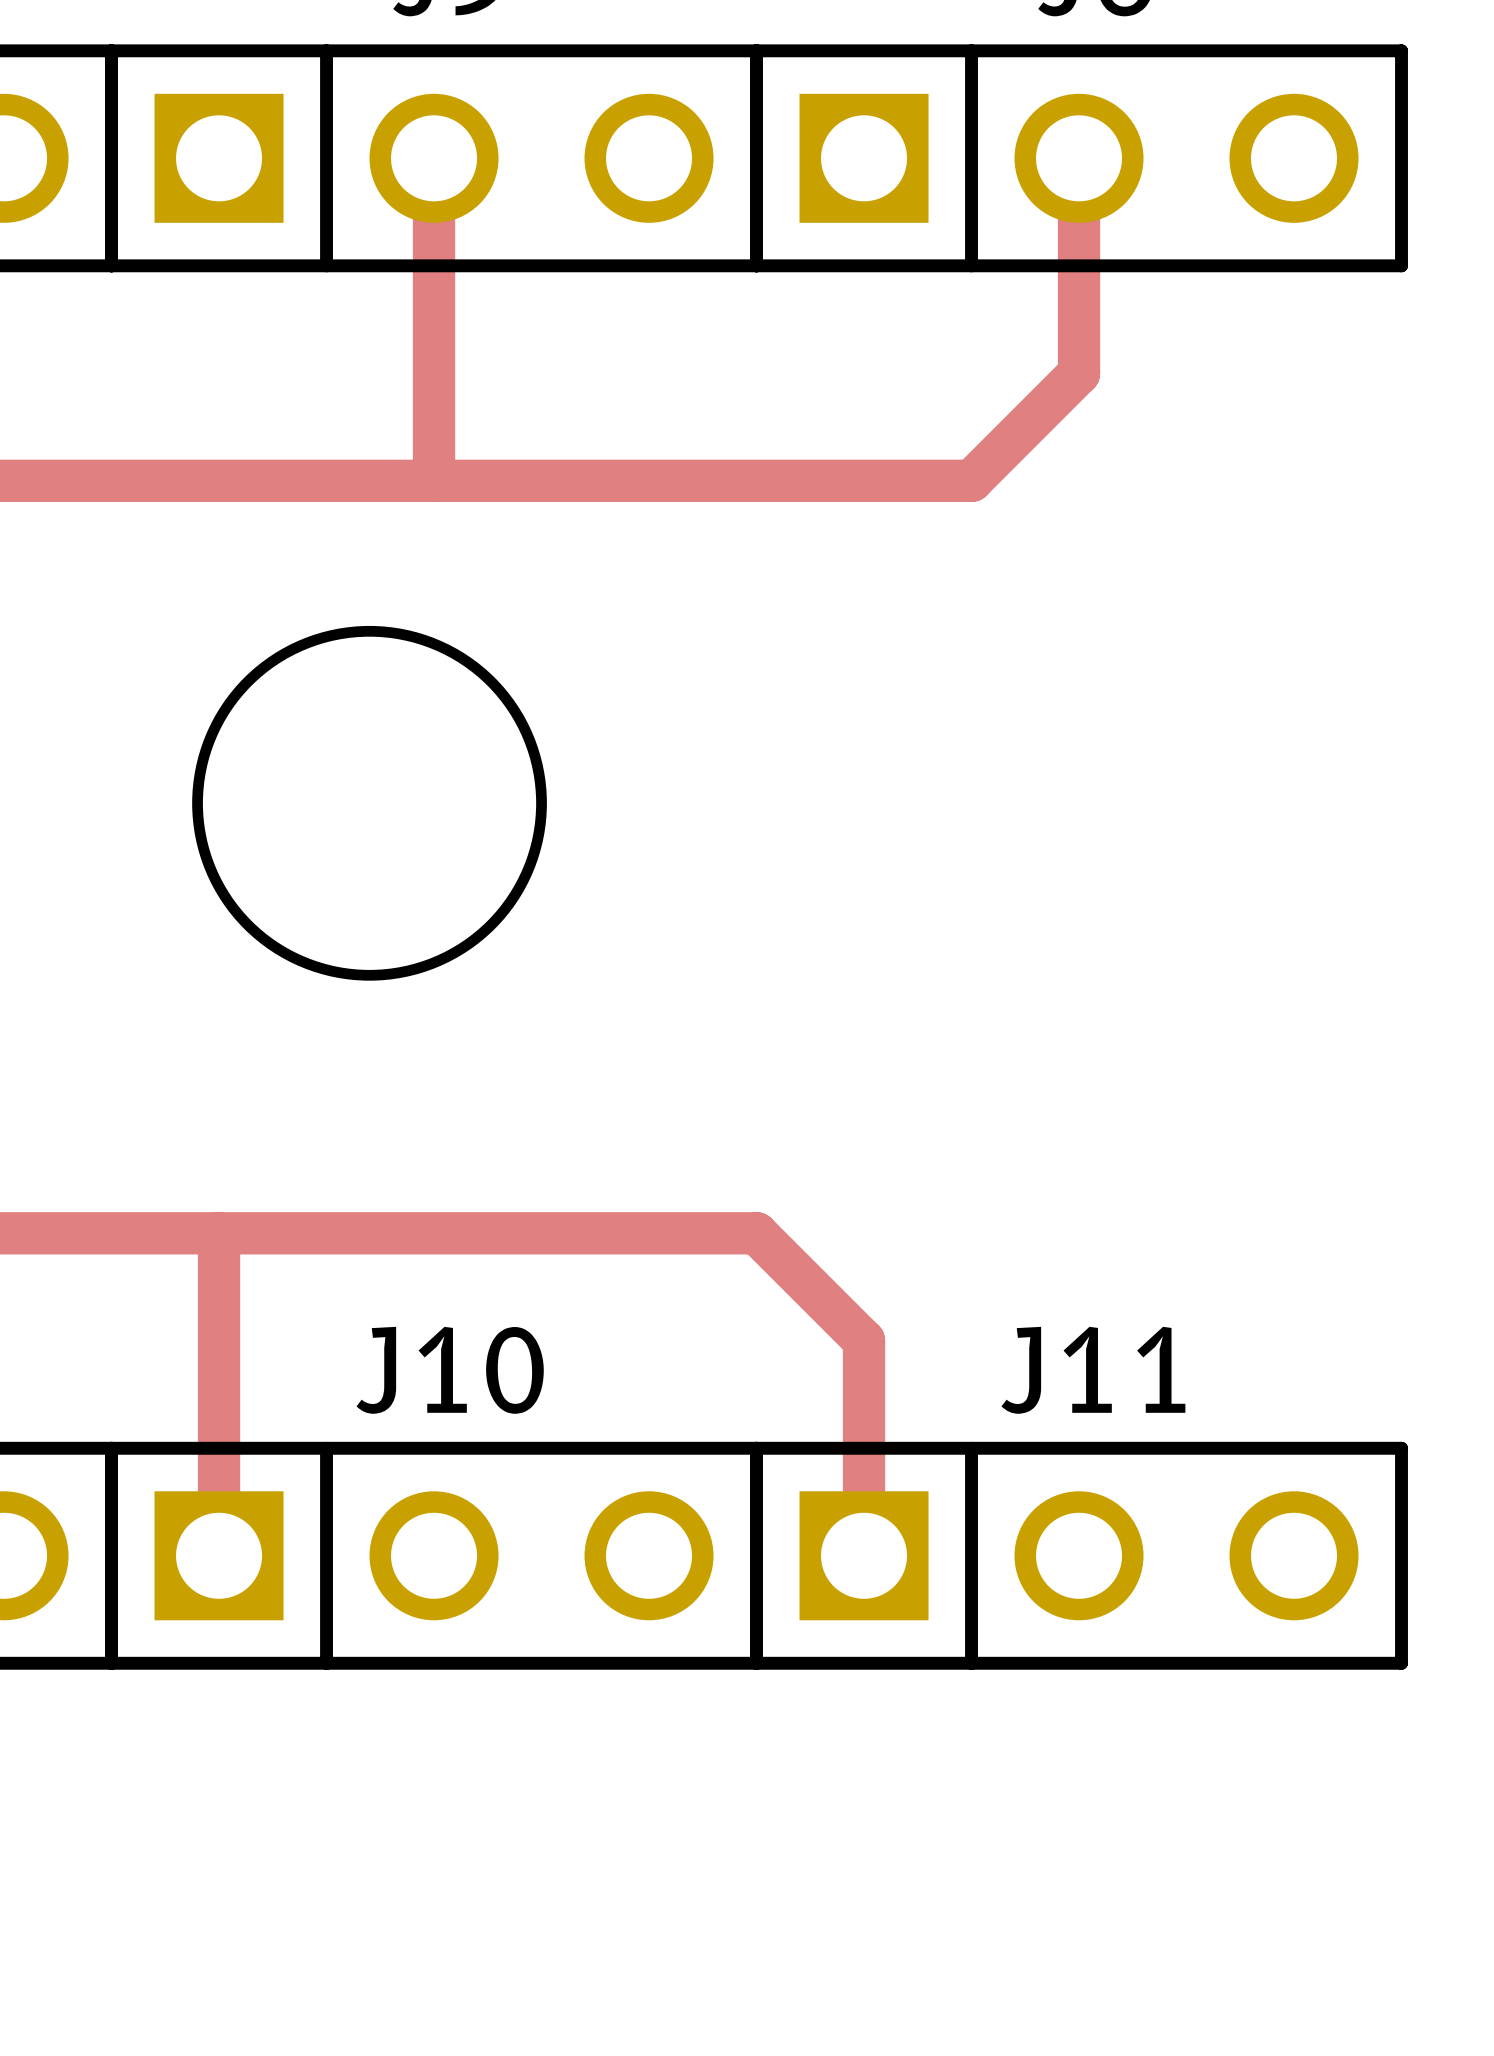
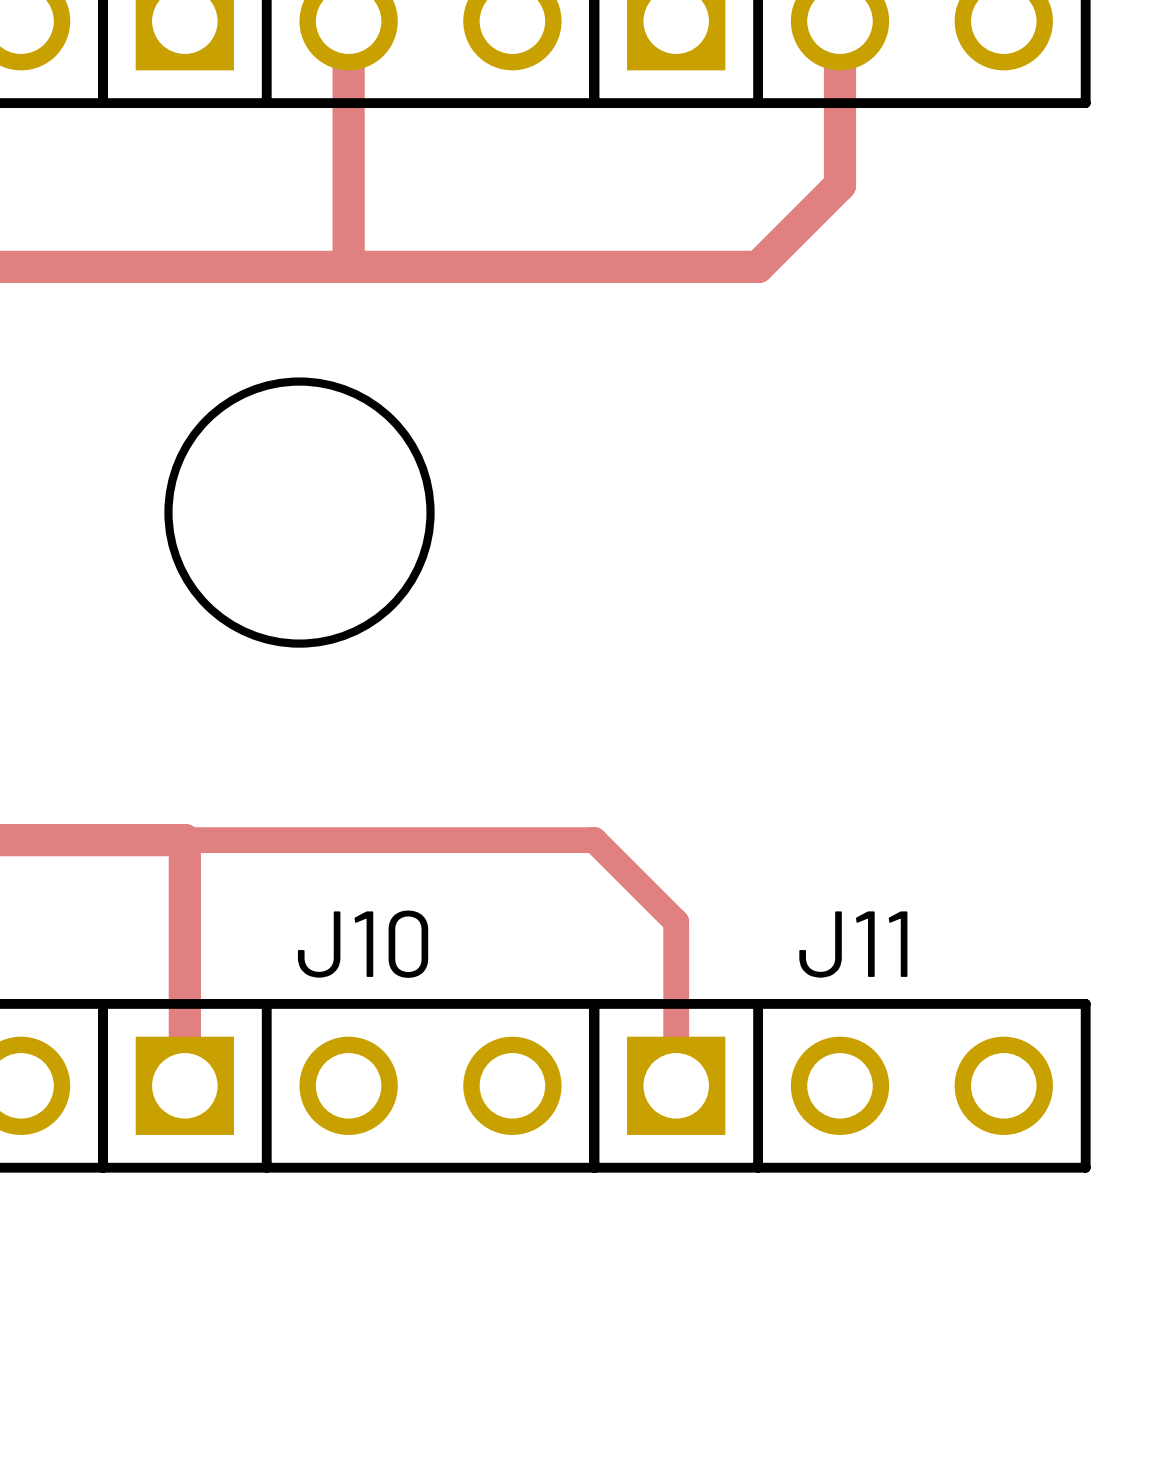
track width: thick (219, 1233) (756, 1233) (864, 1340) (864, 1555) -> thin (184, 840) (594, 840) (676, 922) (676, 1085)

